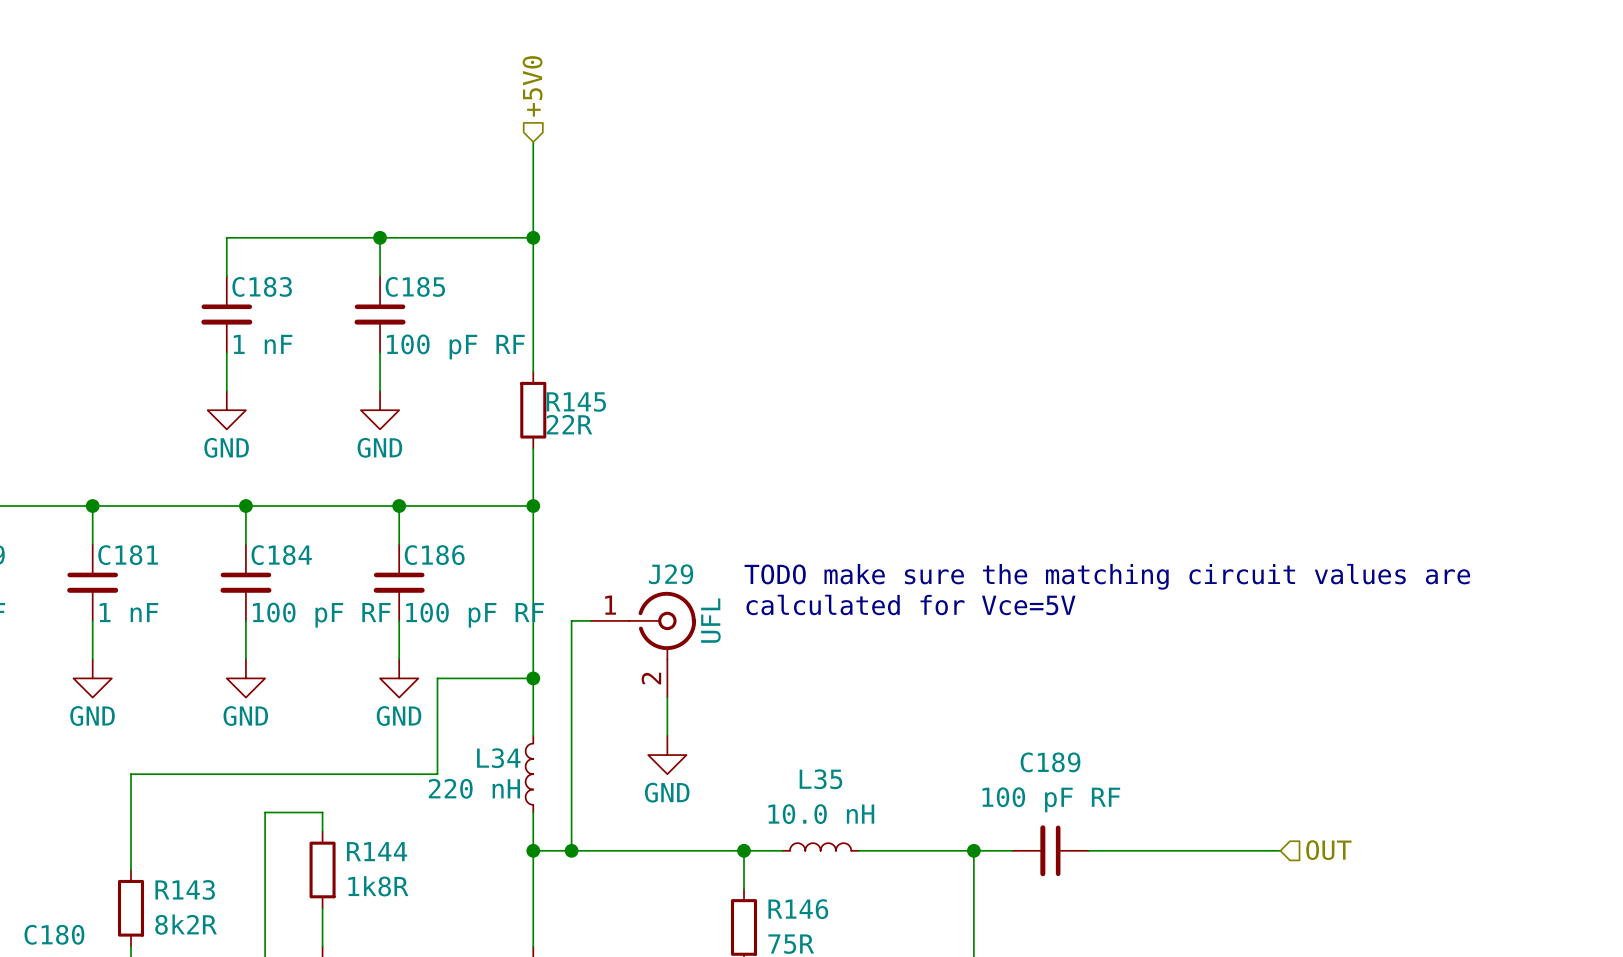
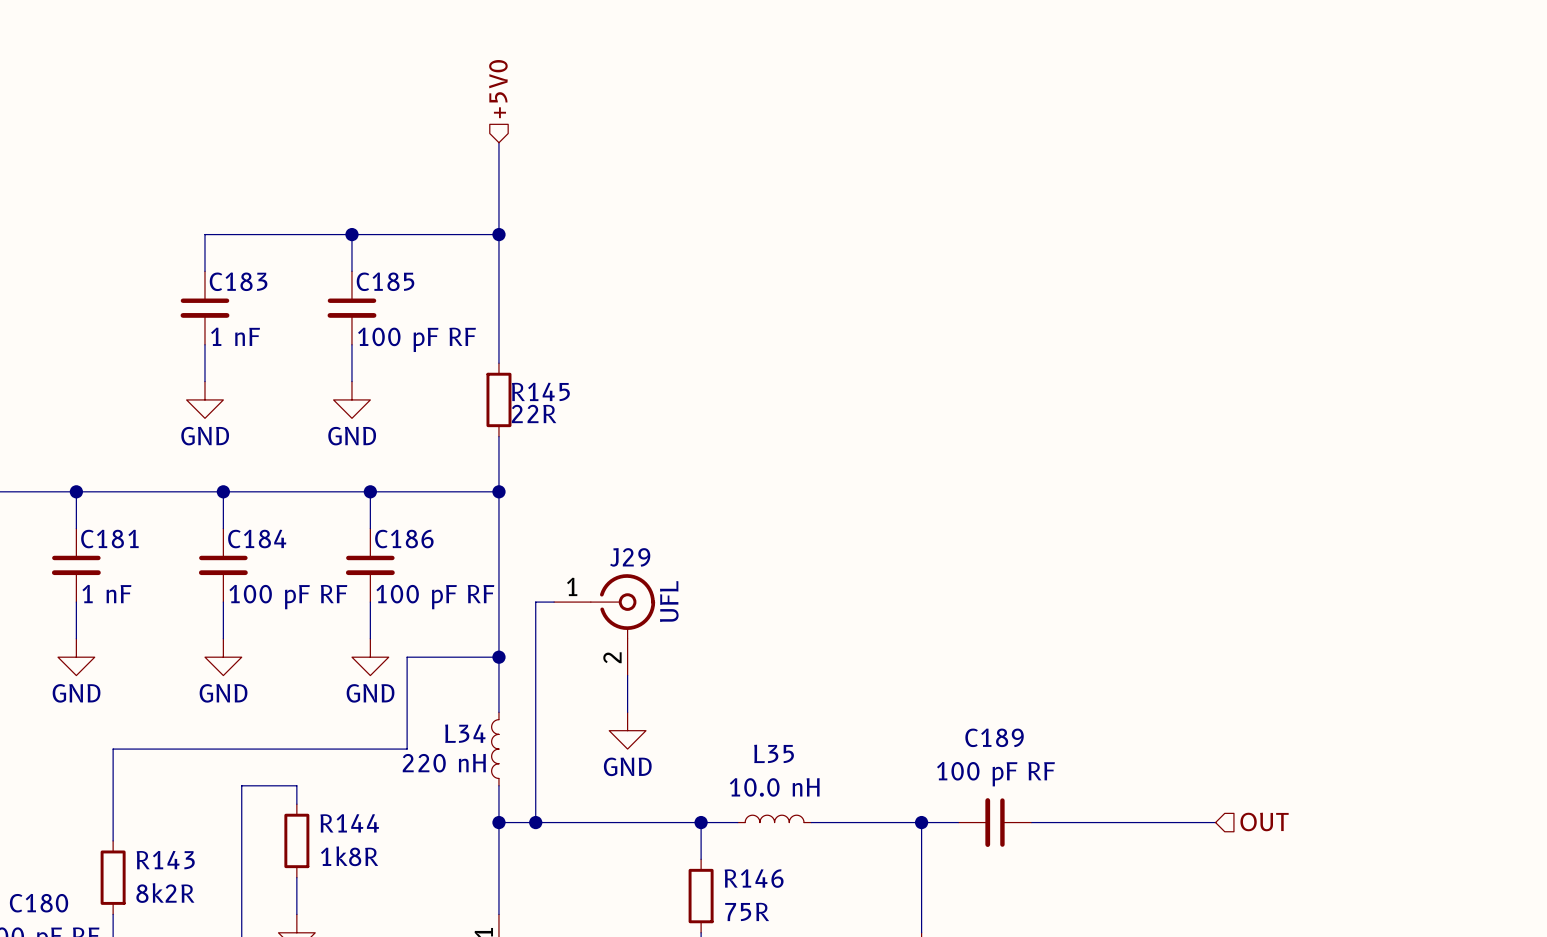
text: TODO make sure the matching circuit values are (1107, 576) -> none
text: calculated for Vce=5V (910, 604) -> none

